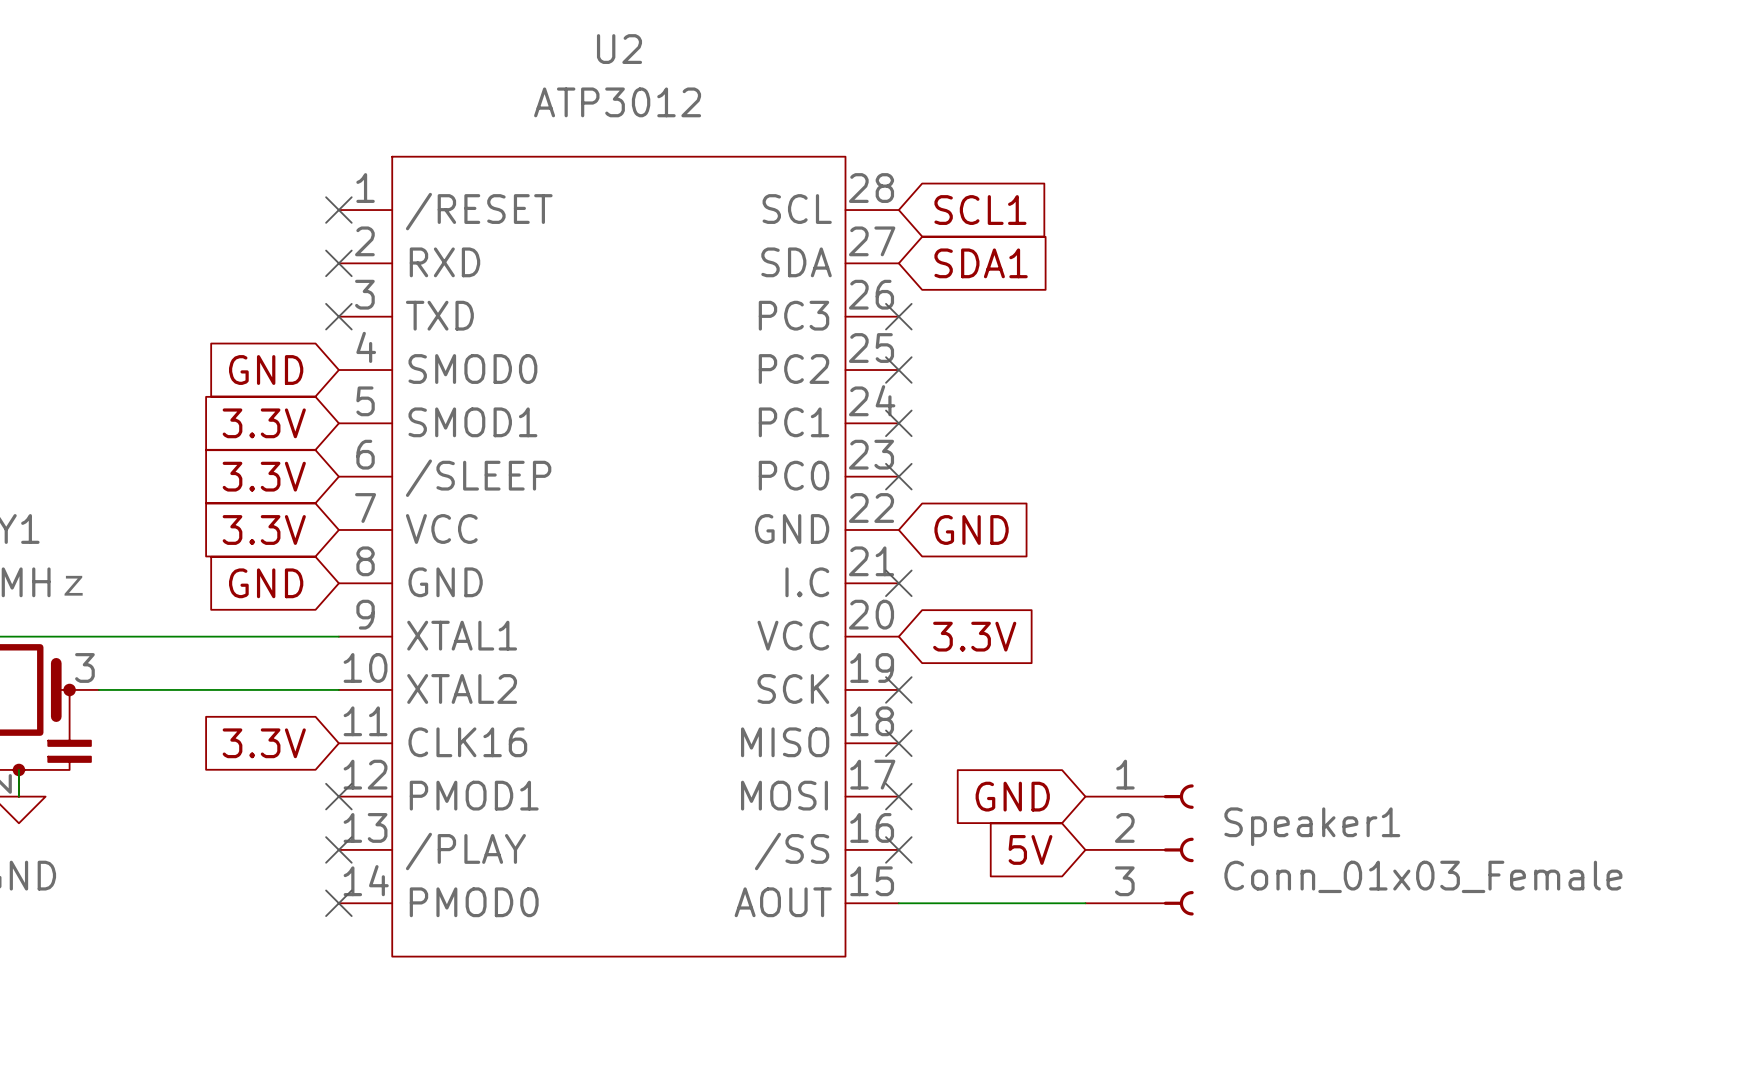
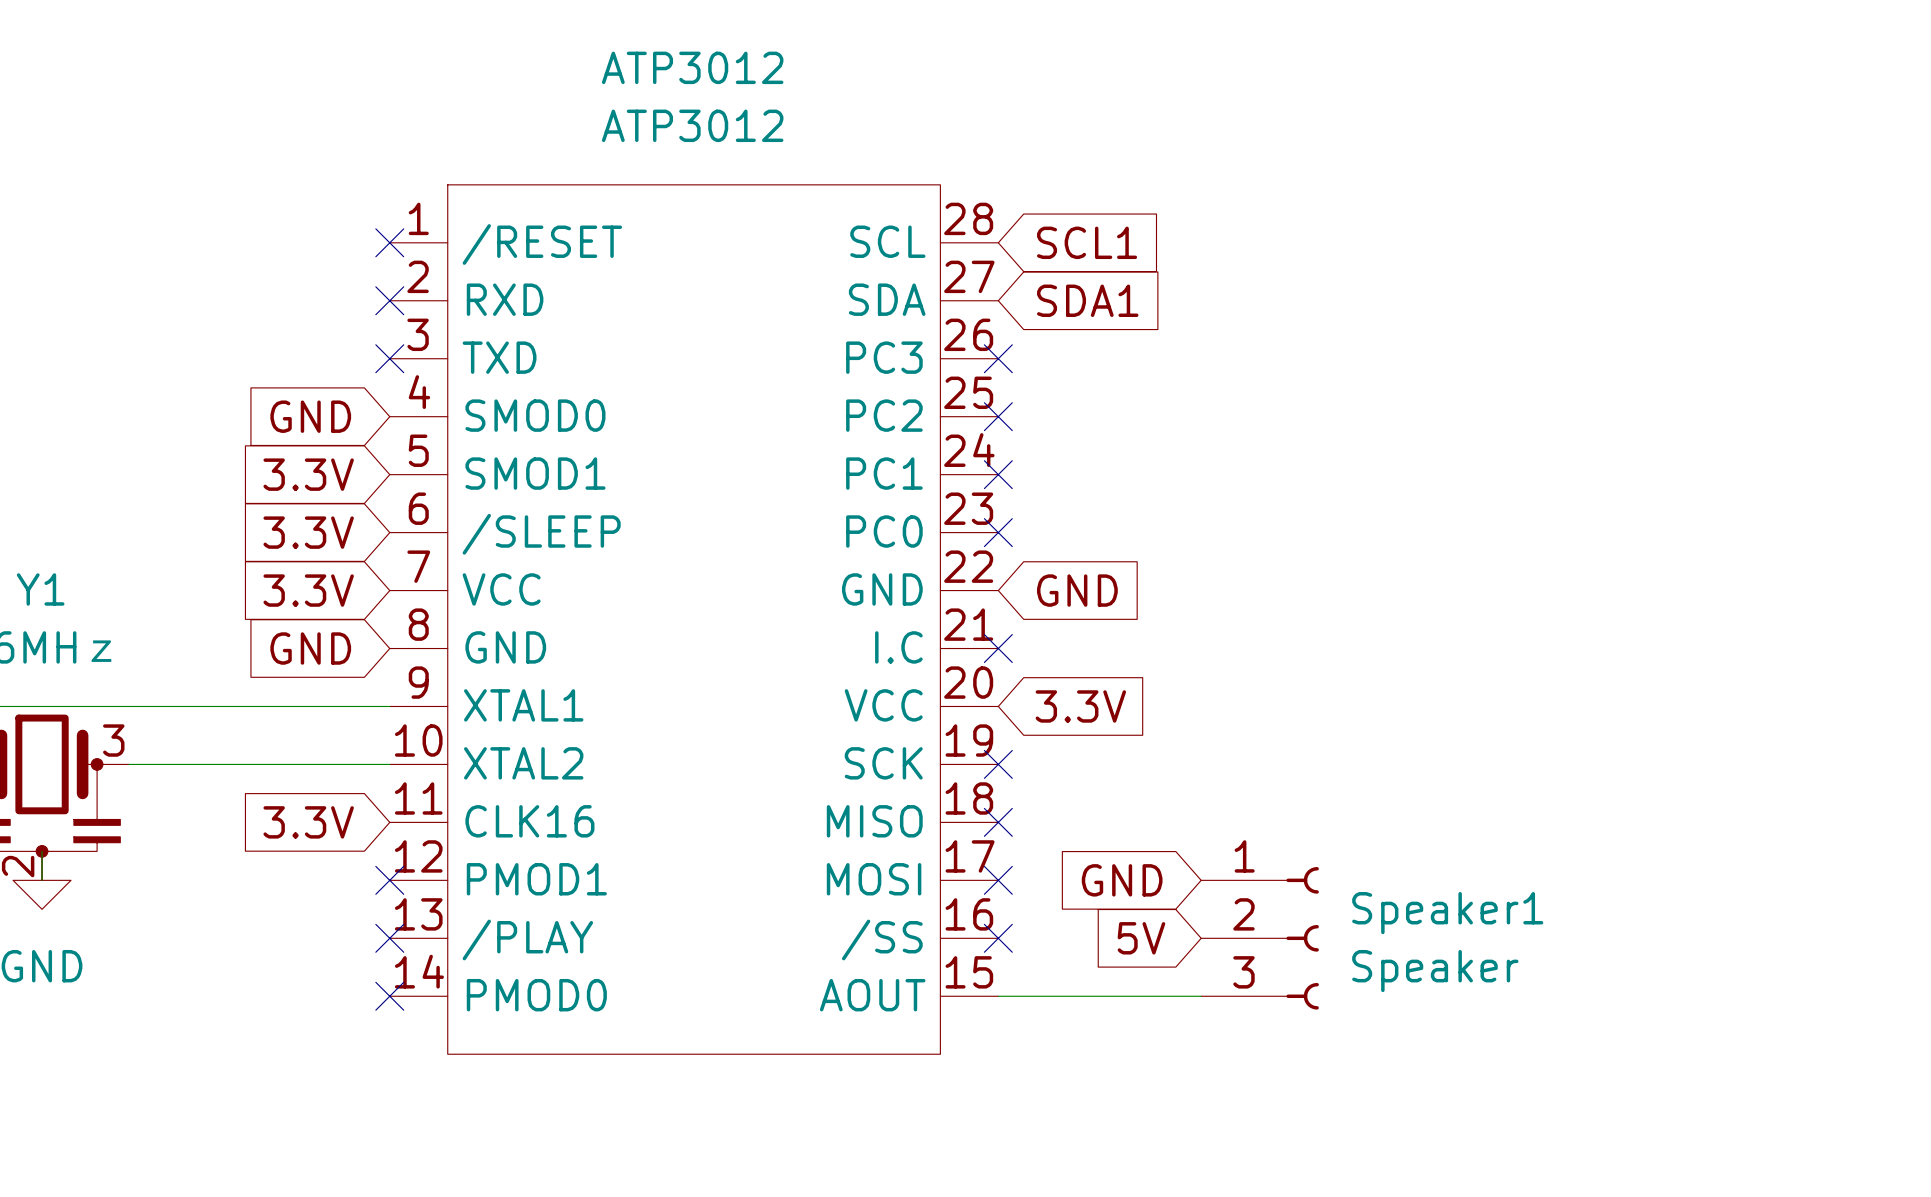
U2 name: U2 (619, 49) -> ATP3012 (692, 67)
Speaker1 value: Conn_01x03_Female (1423, 876) -> Speaker (1435, 971)

